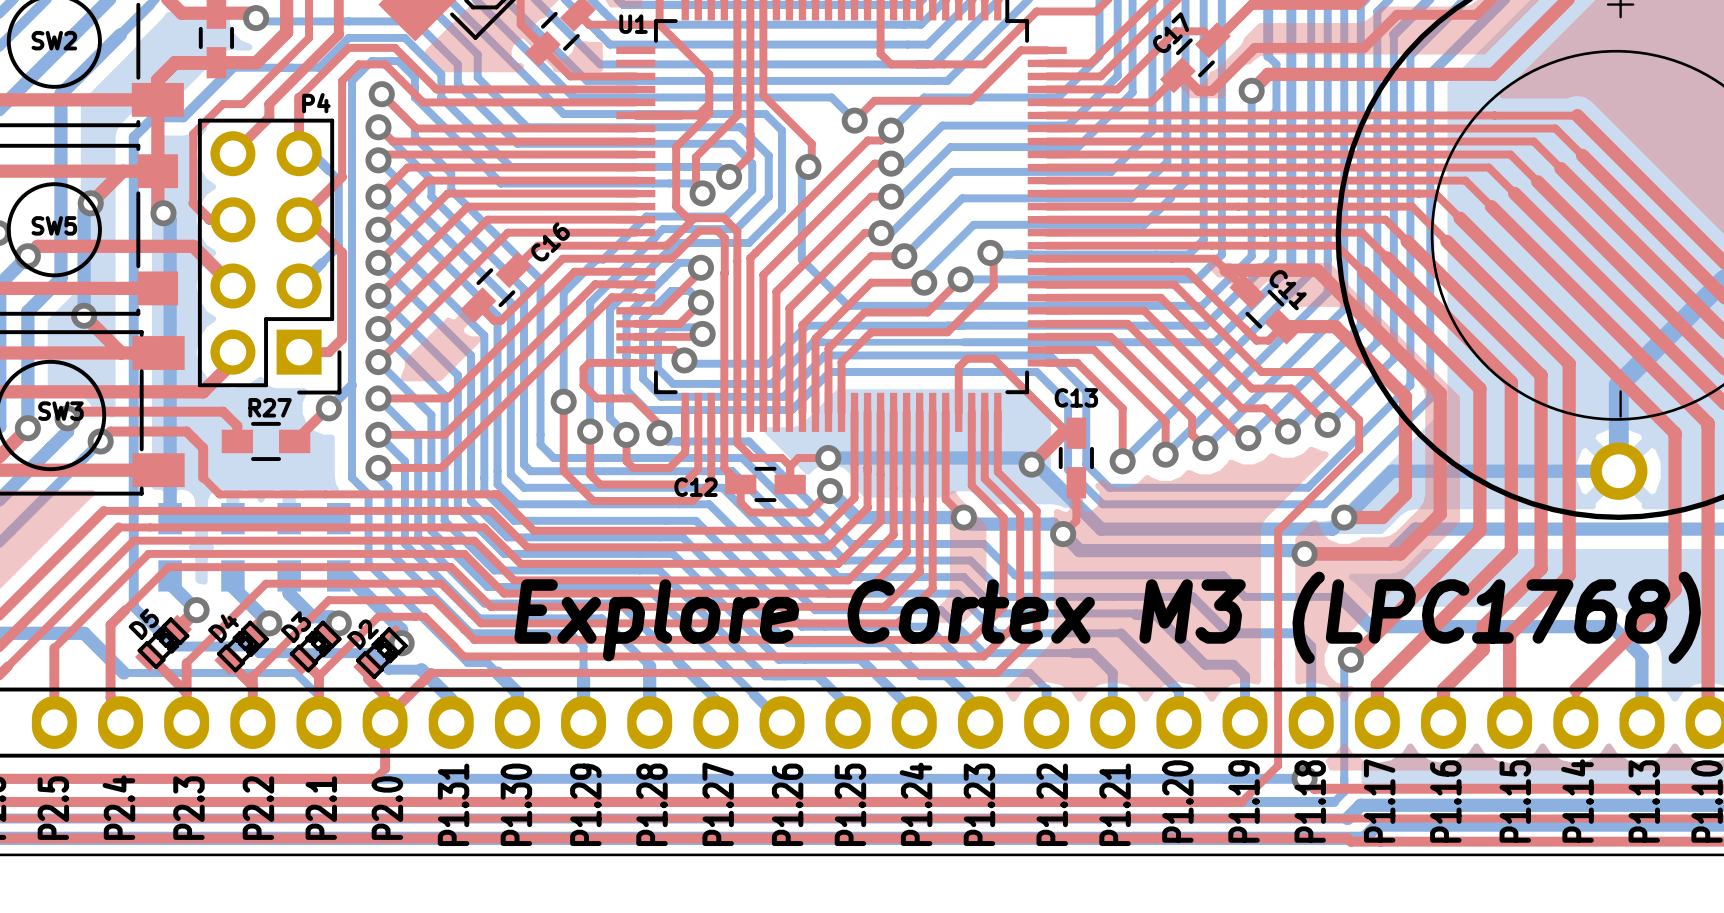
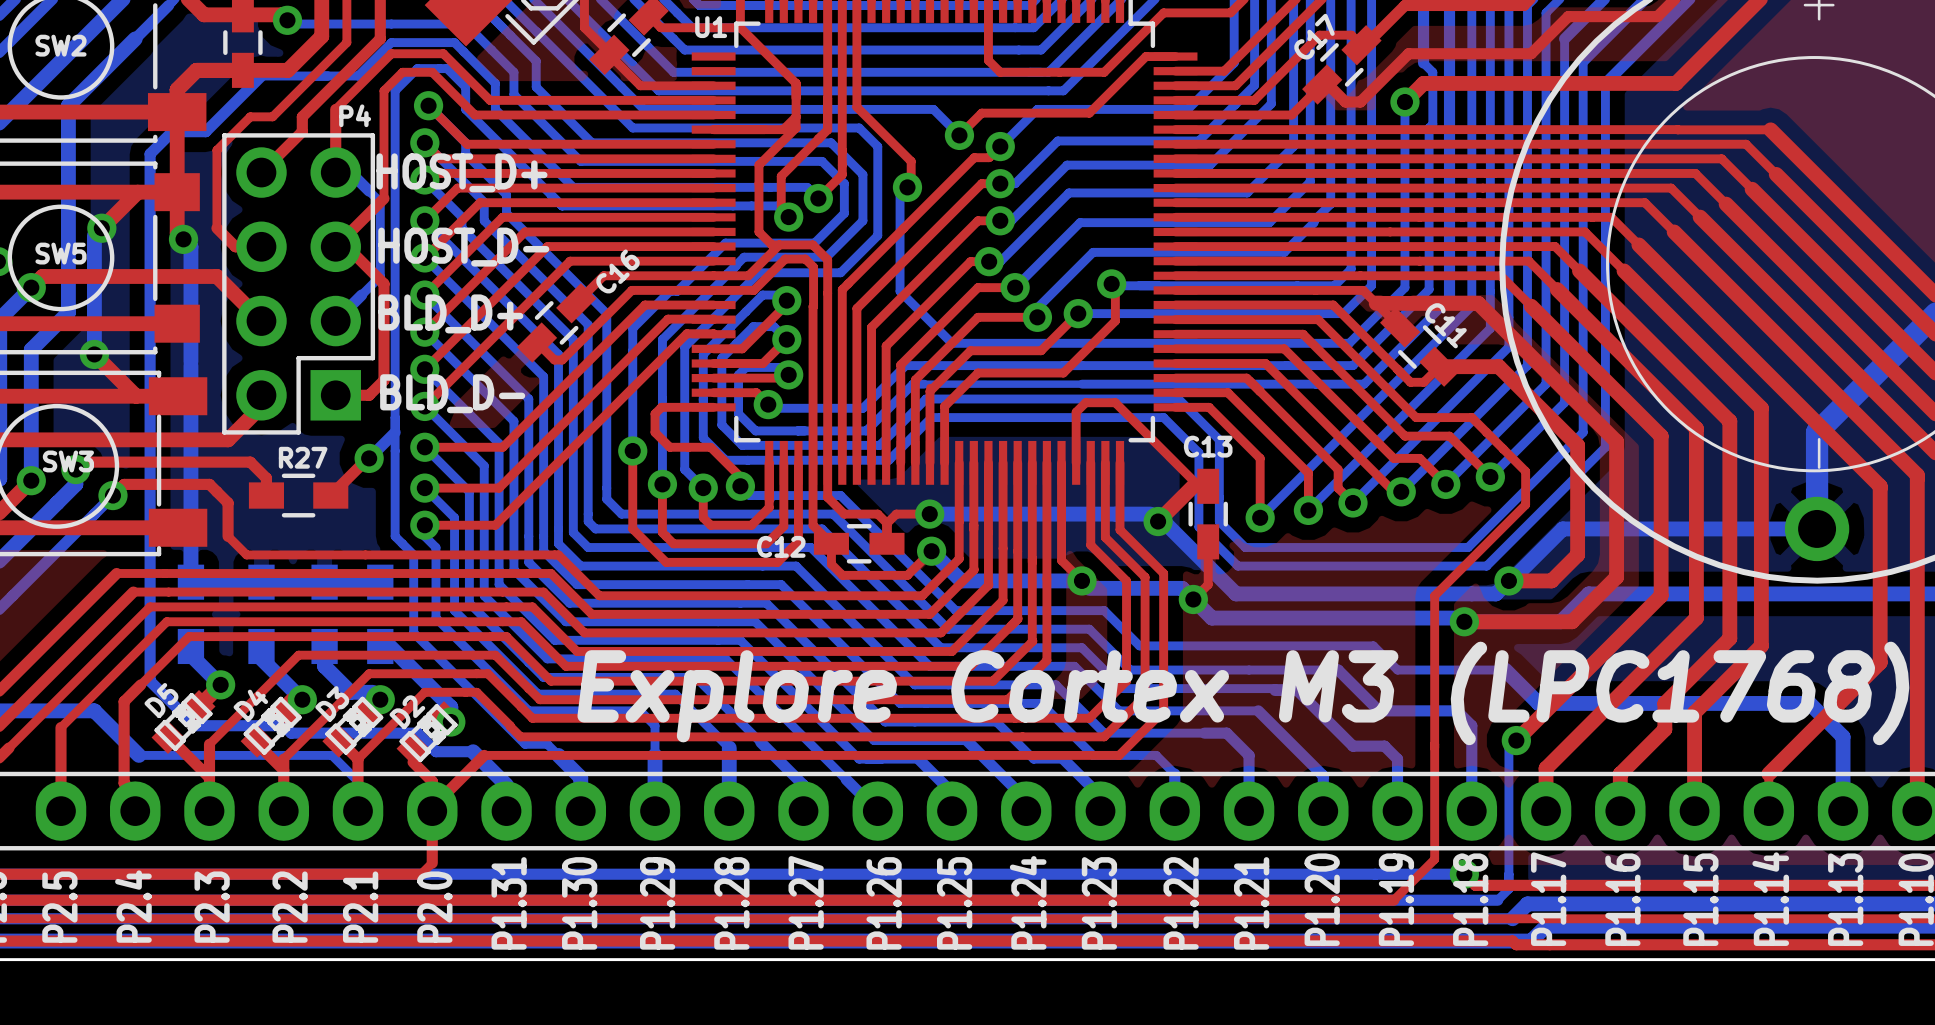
P4 footprint: [197, 118, 342, 395] -> [222, 133, 376, 435]
text: none -> HOST_D+ (461, 172)
text: none -> HOST_D- (463, 247)
text: none -> BLD_D+ (450, 313)
text: none -> BLD_D- (452, 393)

